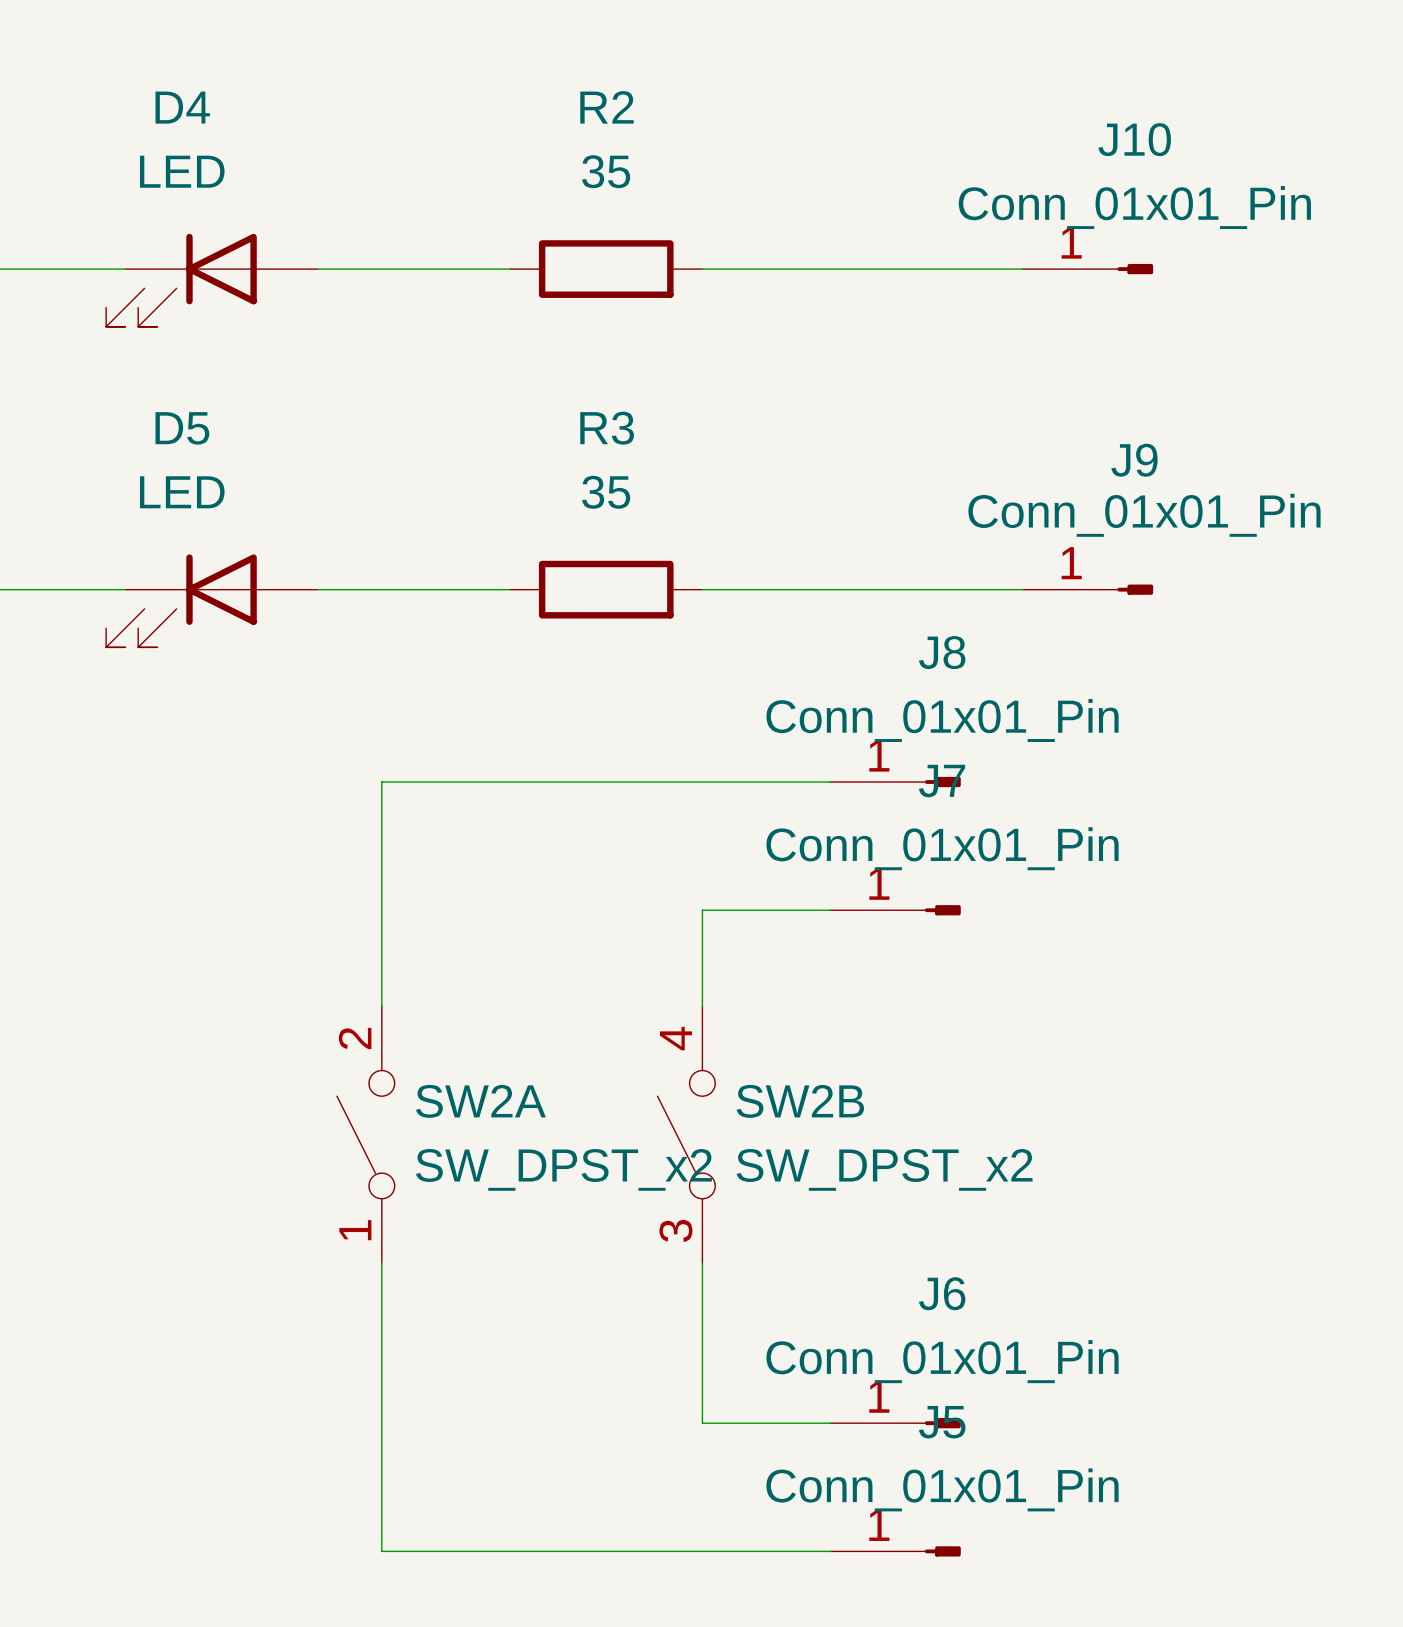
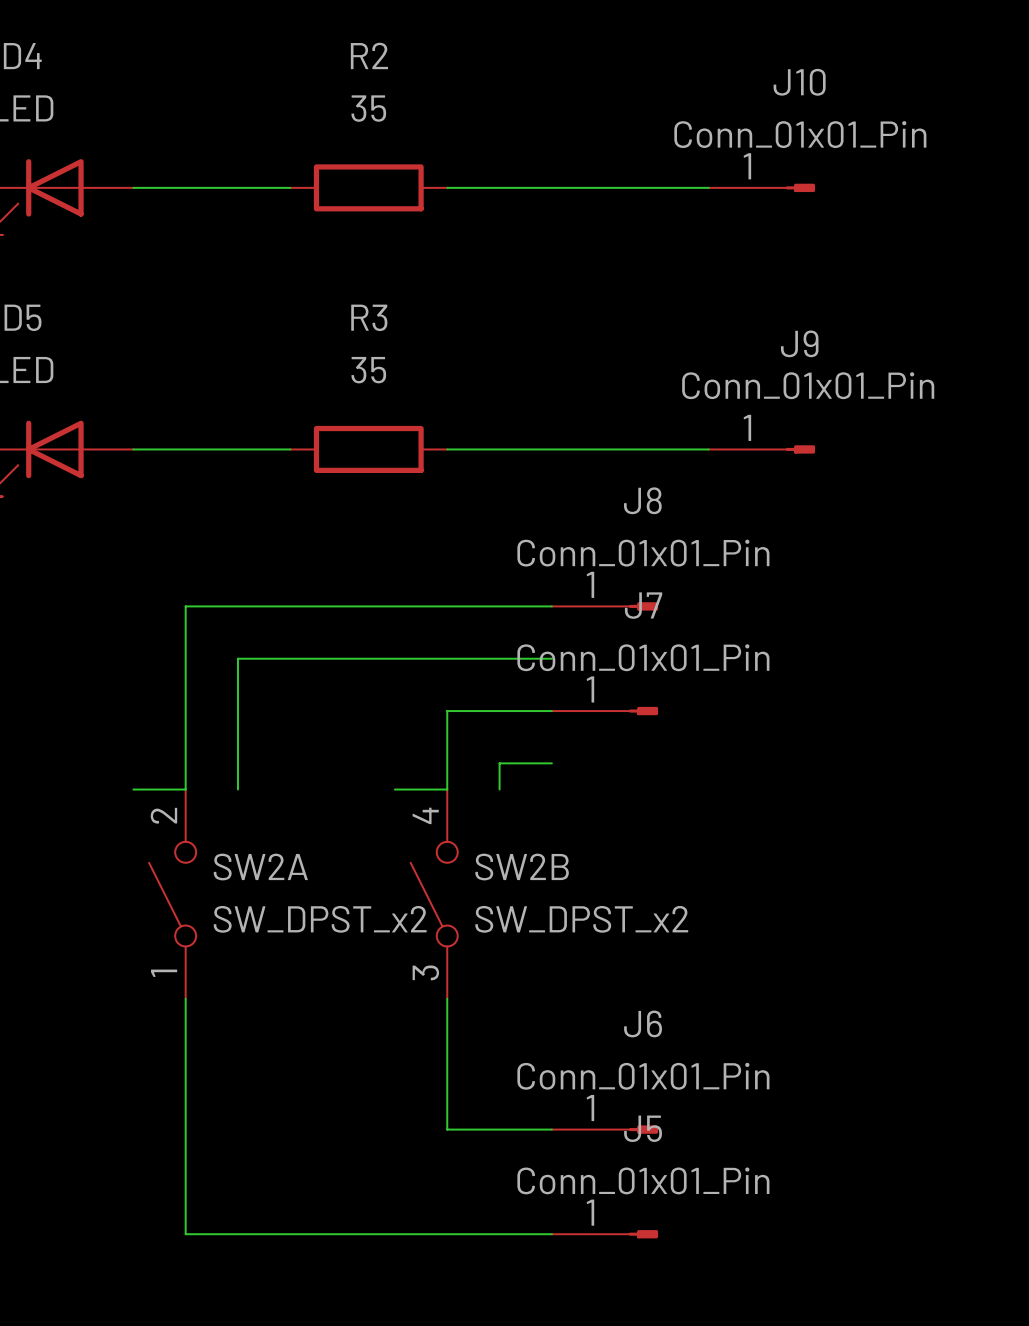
wire: none -> (551, 658) (237, 658) (237, 789)
wire: none -> (551, 763) (499, 763) (499, 789)
wire: none -> (133, 789) (185, 789)
wire: none -> (394, 789) (447, 789)

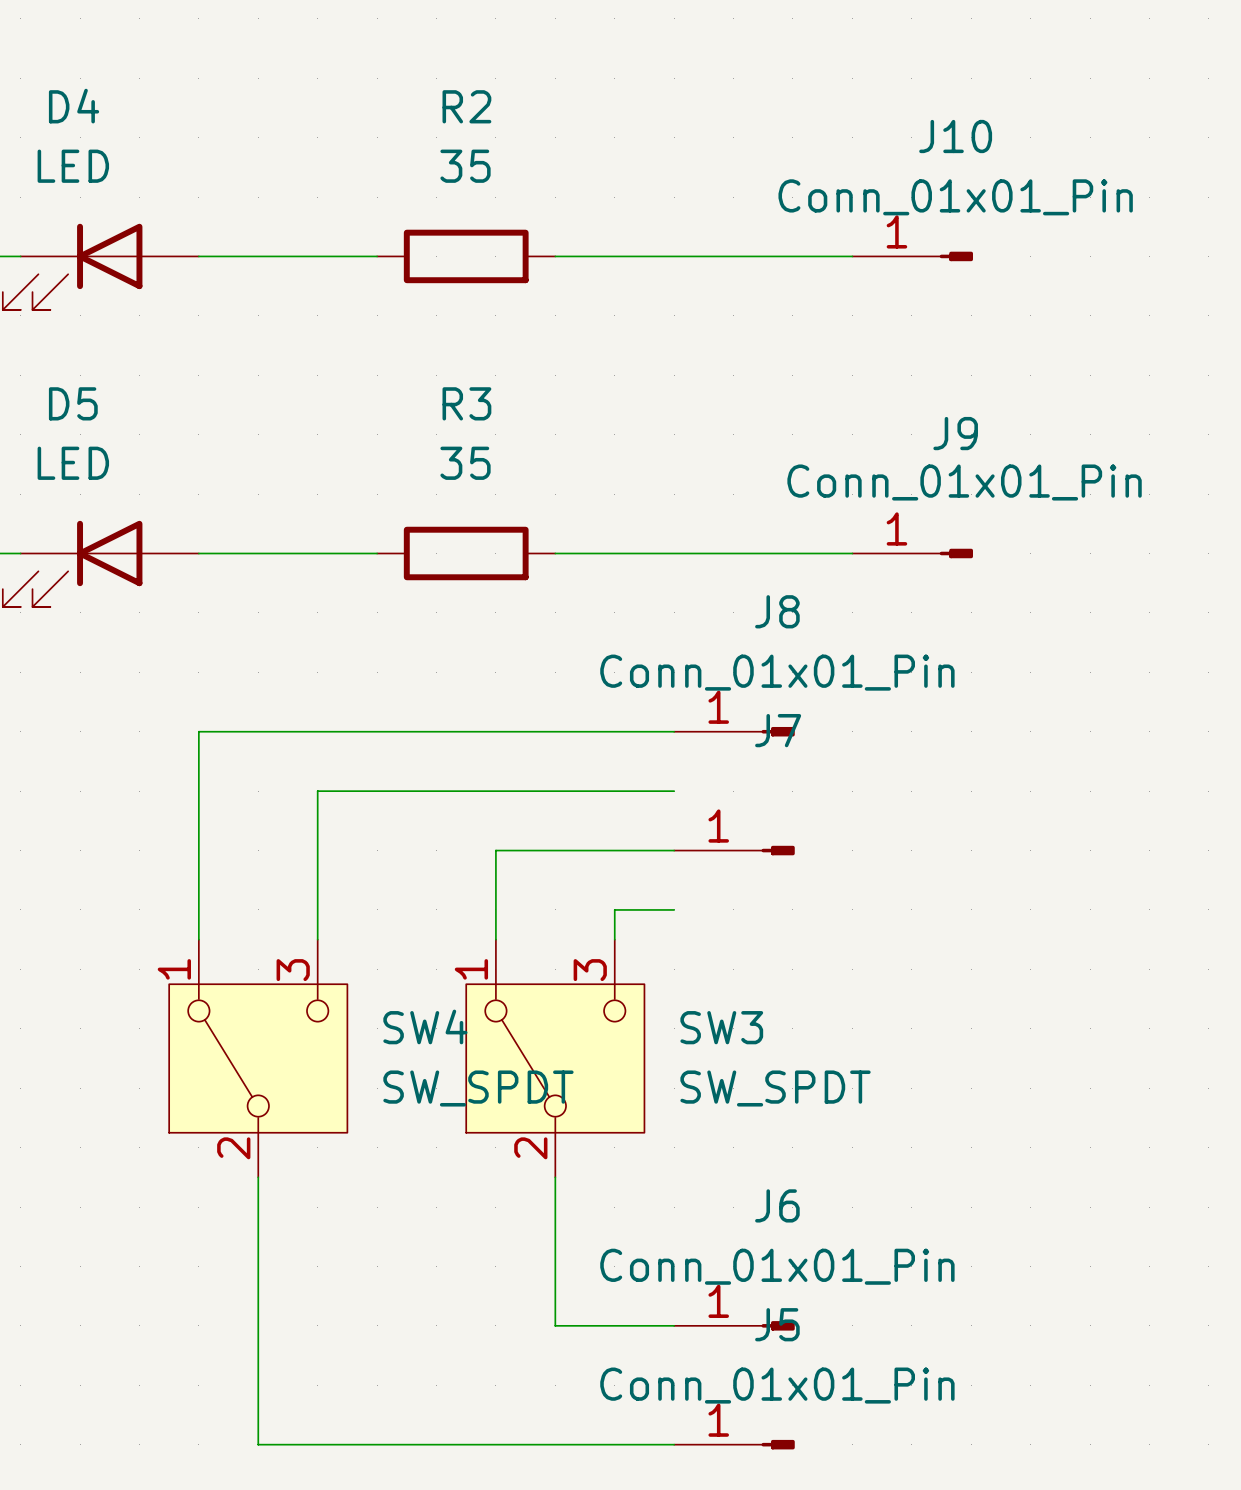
wire: (185, 606) (185, 789) (133, 789) -> (258, 731) (198, 731) (198, 939)
J7 value: Conn_01x01_Pin (643, 657) -> none
wire: (447, 711) (447, 789) (394, 789) -> (555, 850) (495, 850) (495, 939)
SW2A: SW_DPST_x2 (172, 894) -> none
SW4: none -> SW_SPDT (258, 1058)
SW2B: SW_DPST_x2 (434, 894) -> none
SW3: none -> SW_SPDT (555, 1058)

